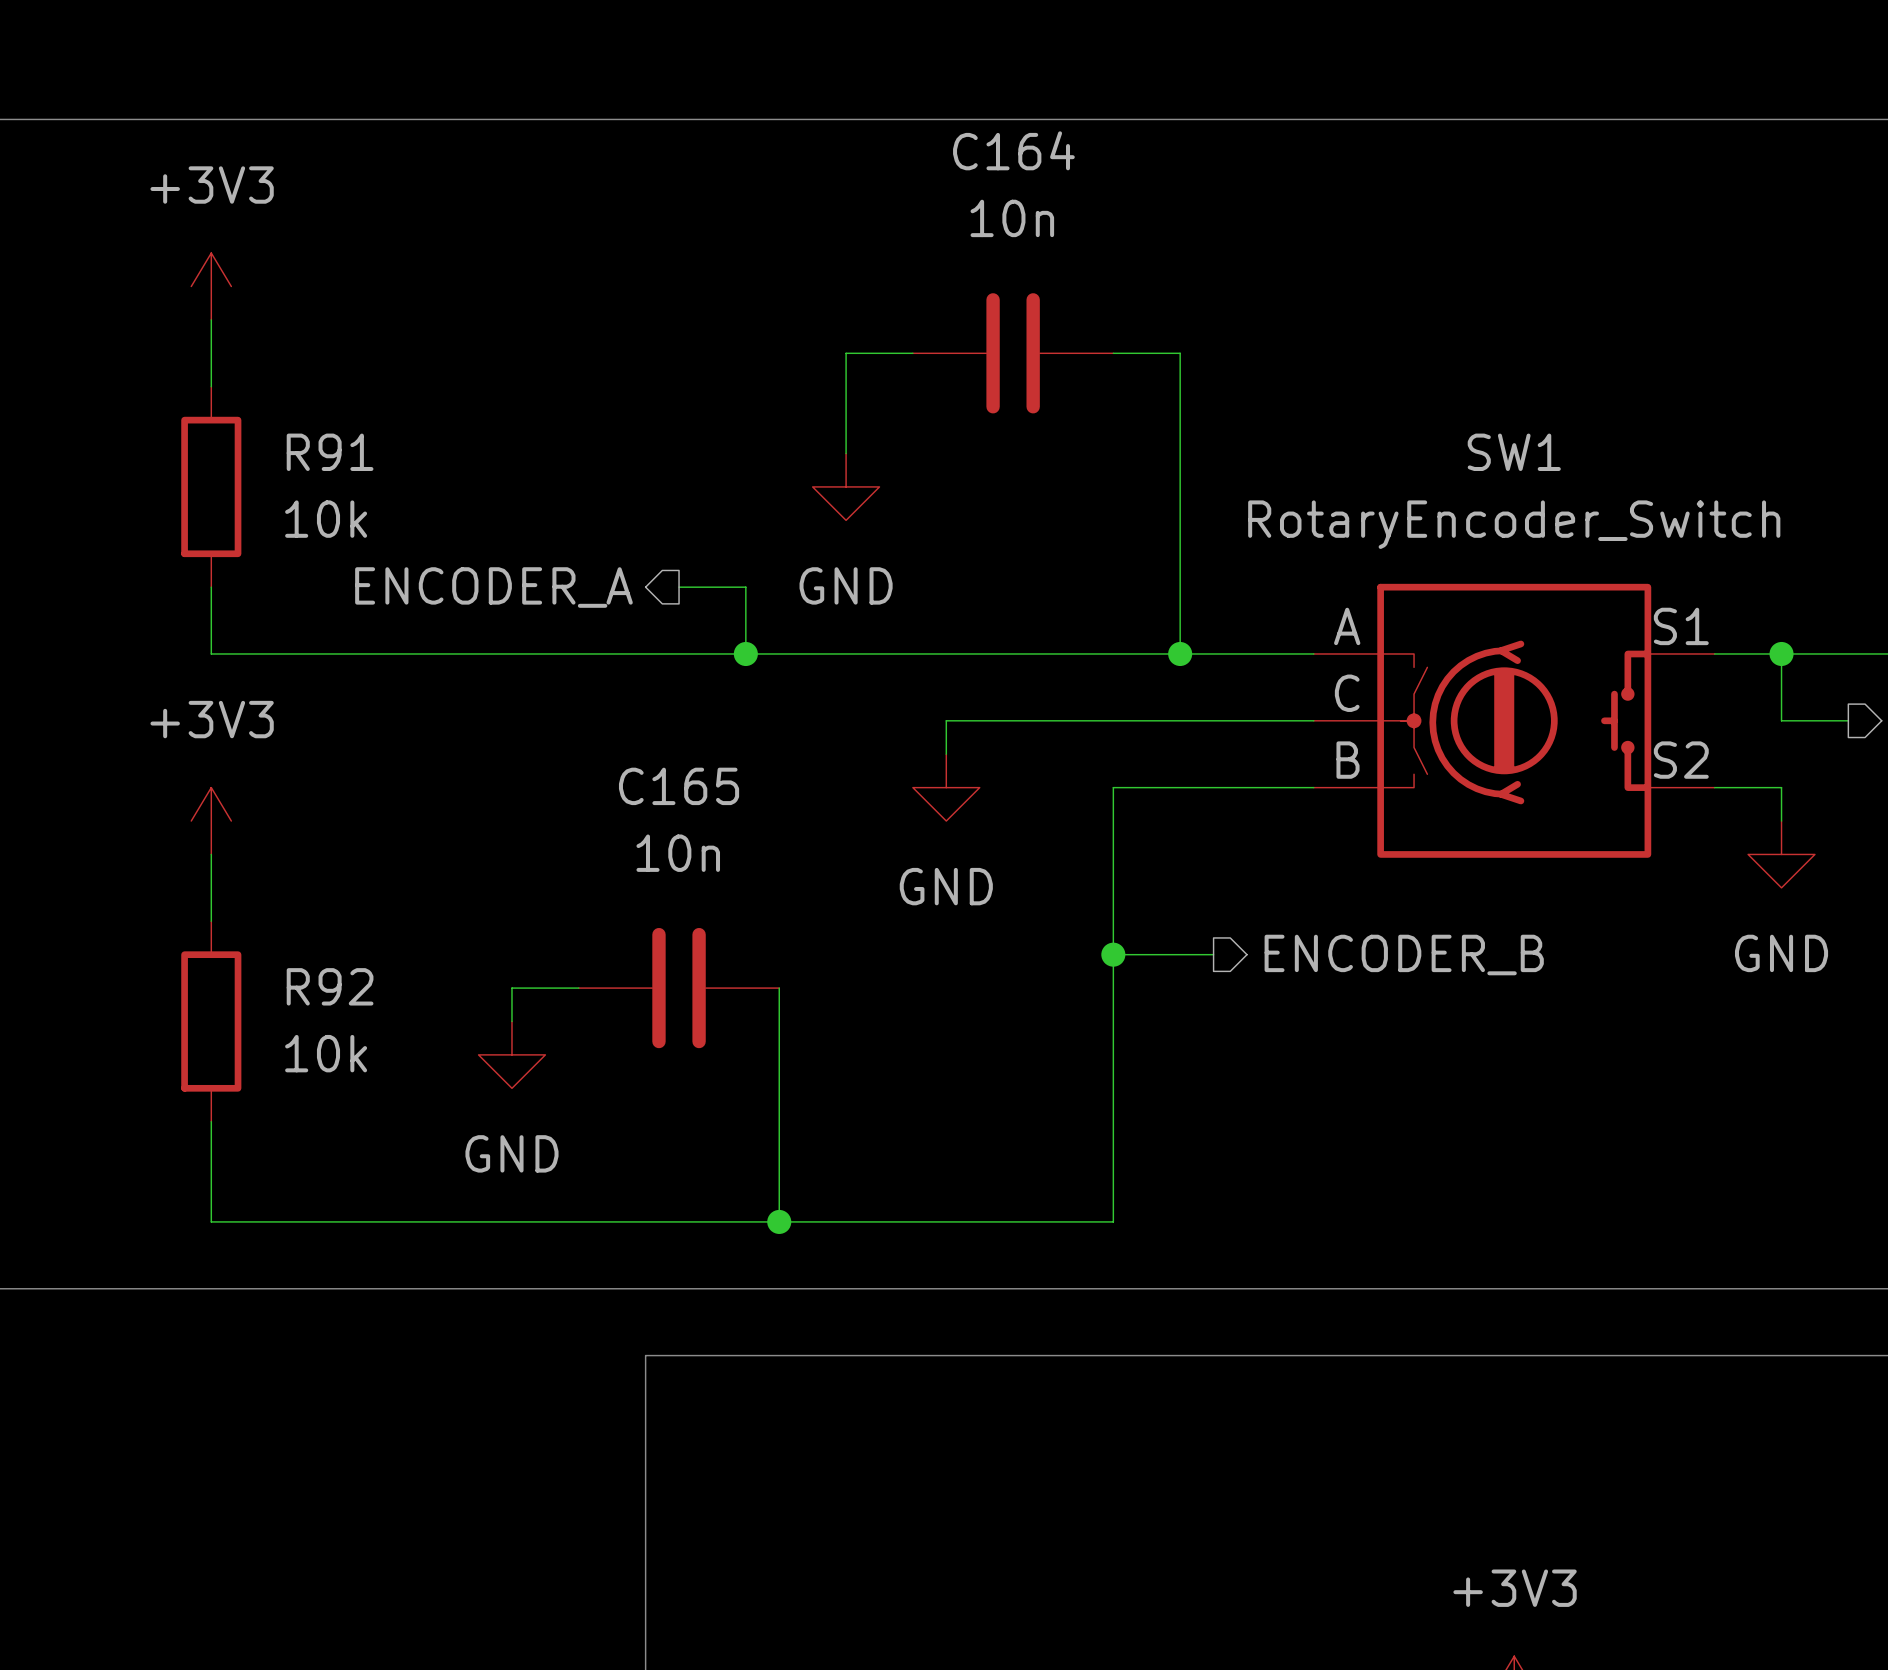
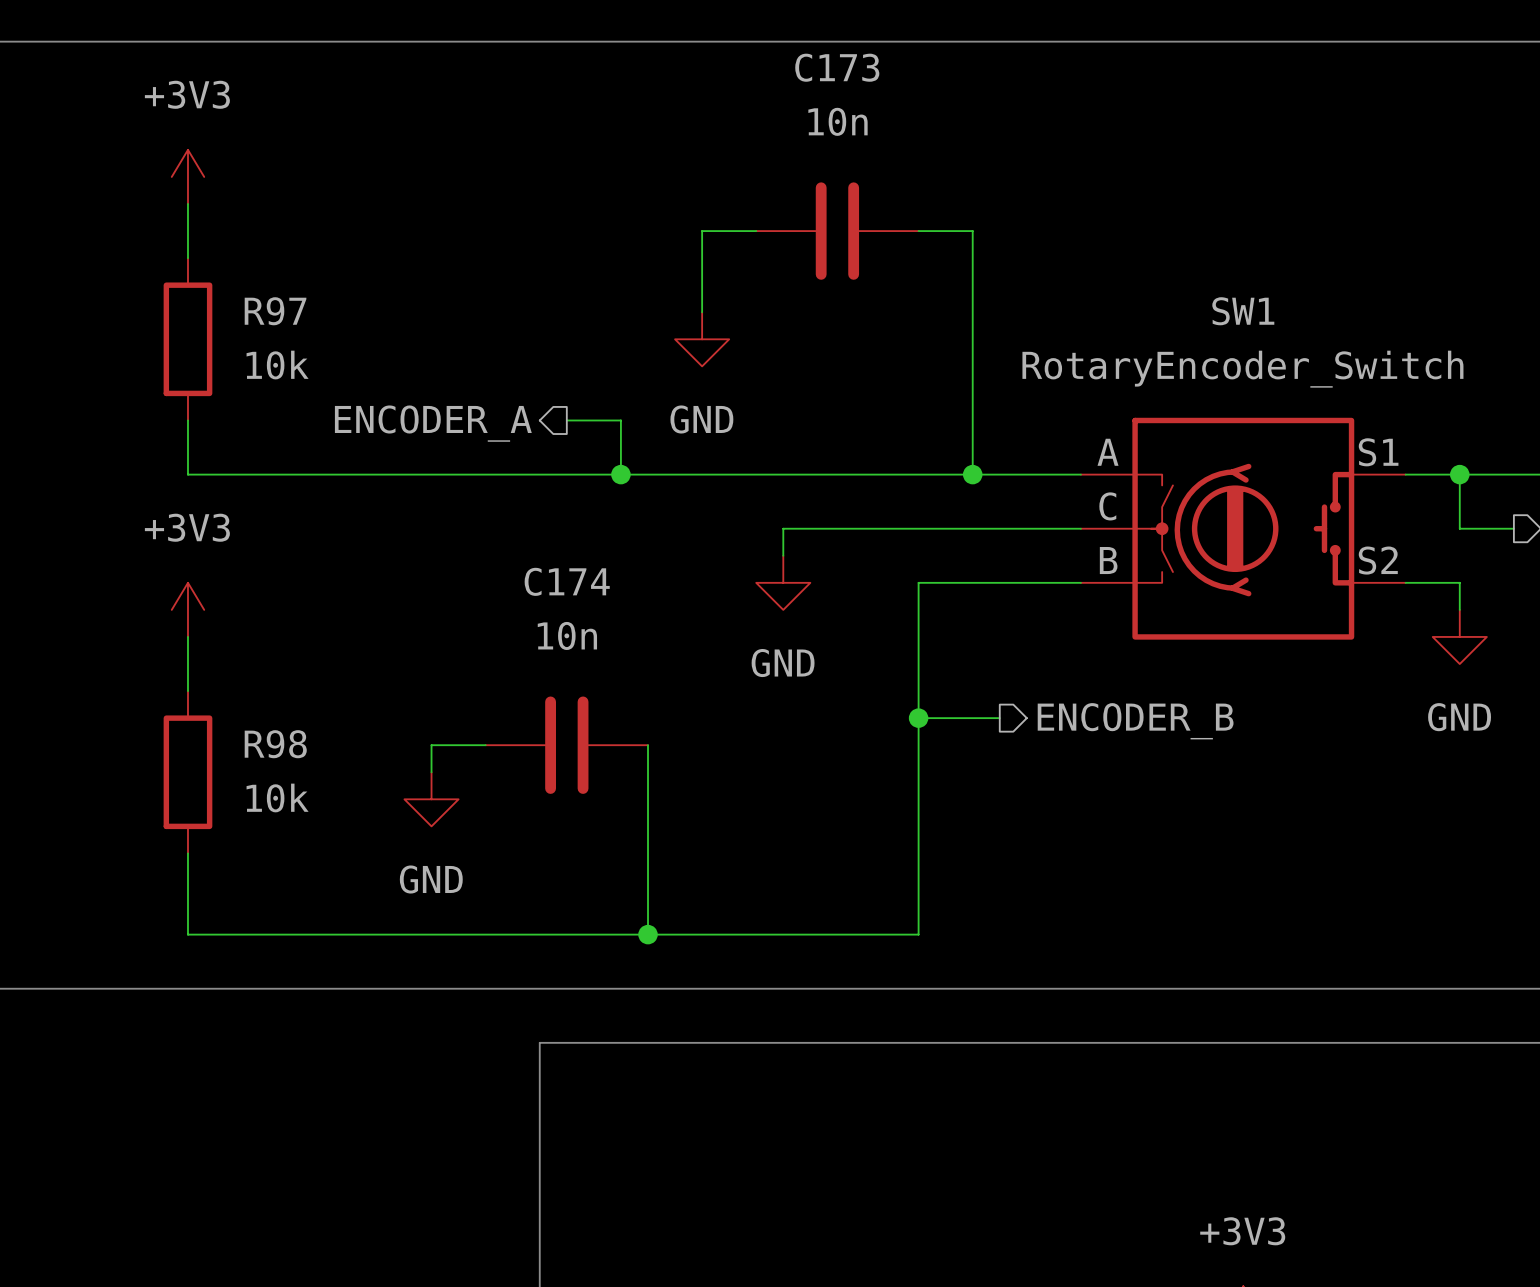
C164 name: C164 (1013, 150) -> C173 (837, 67)
R91 name: R91 (330, 452) -> R97 (275, 311)
C165 name: C165 (679, 786) -> C174 (567, 581)
R92 name: R92 (330, 986) -> R98 (275, 744)

